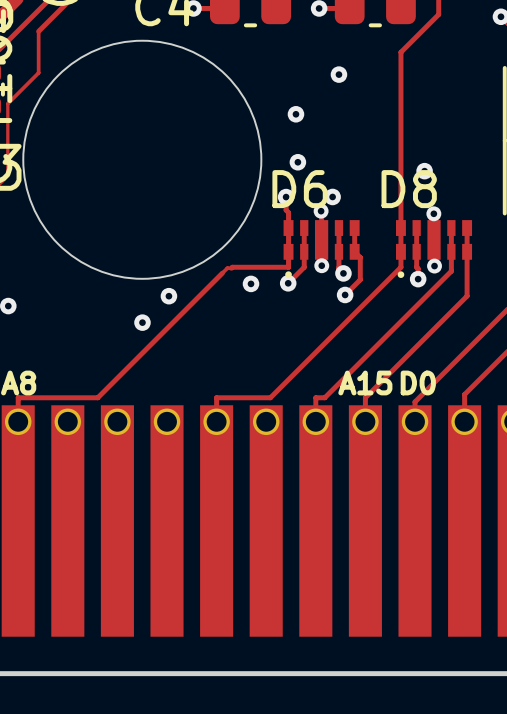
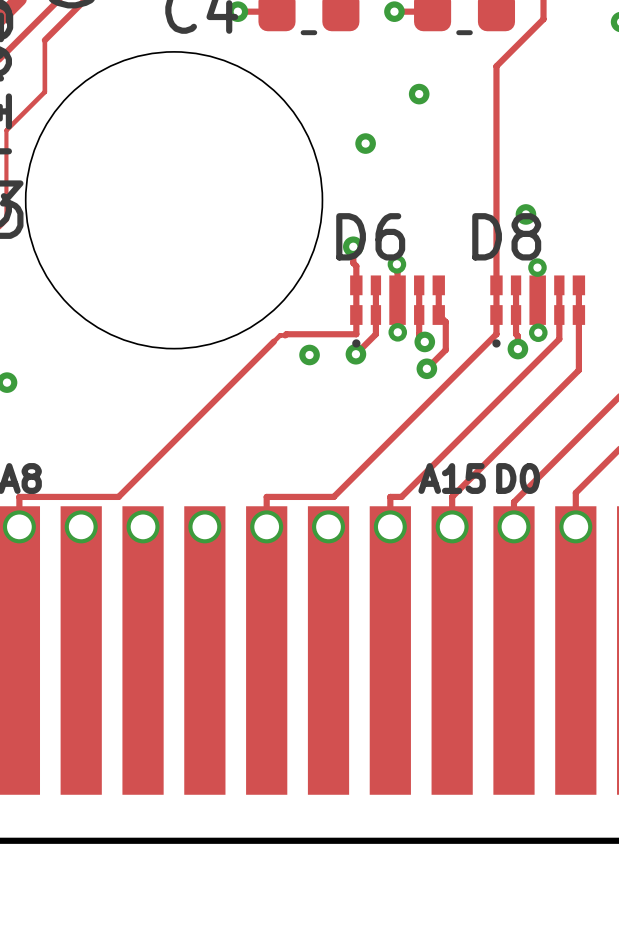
via: (297, 162) -> none
via: (332, 196) -> none
via: (168, 296) -> none
via: (142, 322) -> none

